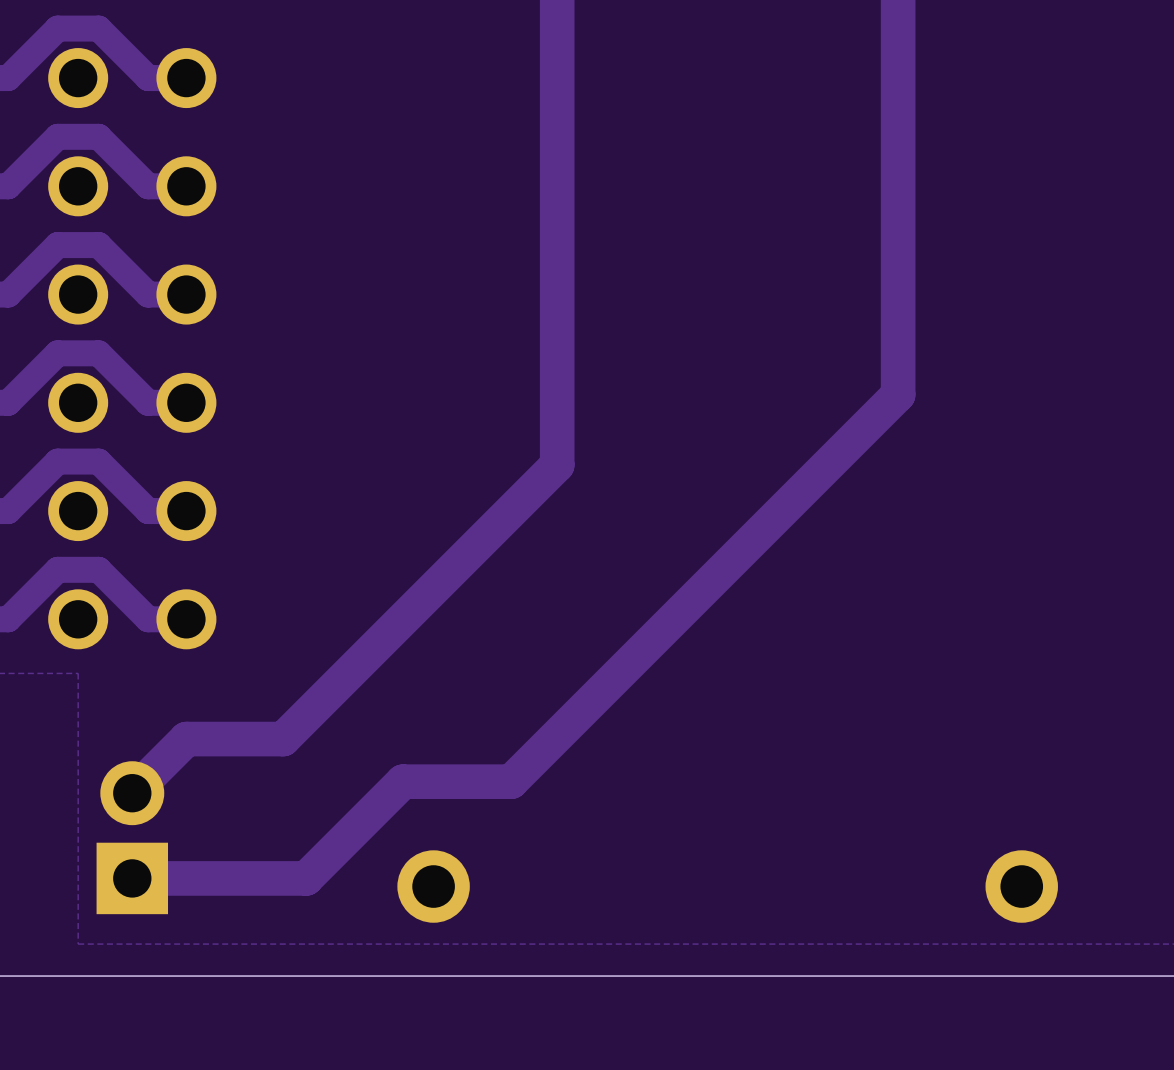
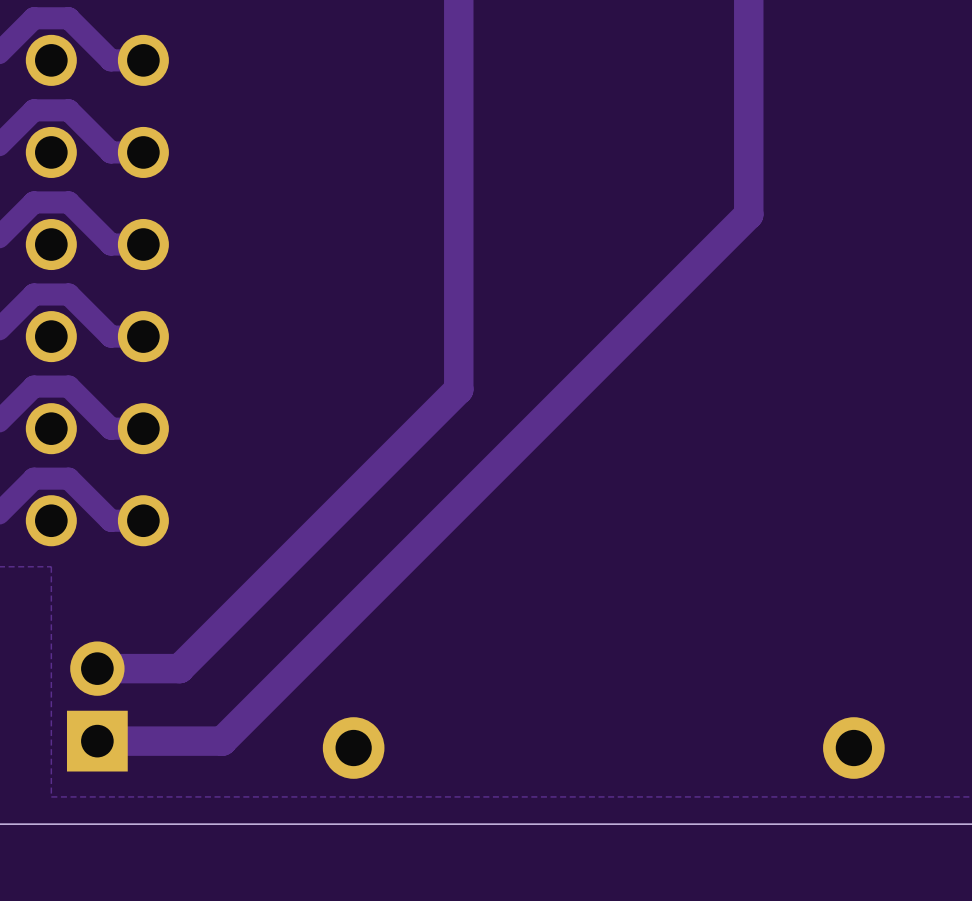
track: (898, 259) (898, 394) (511, 781) (402, 781) (306, 878) (279, 878) -> (748, 214) (222, 741)
track: (283, 739) (186, 739) (132, 793) -> (225, 622) (179, 668) (97, 668)

